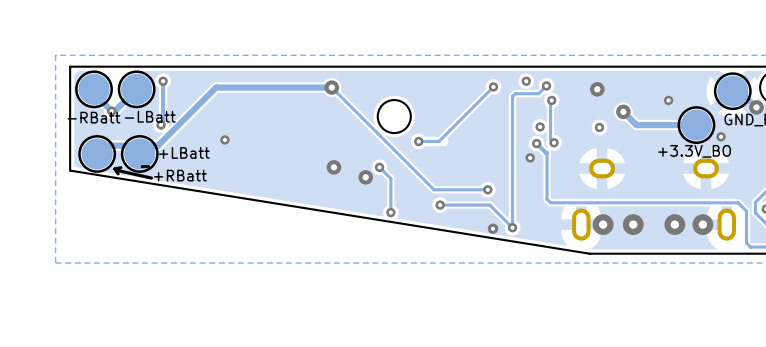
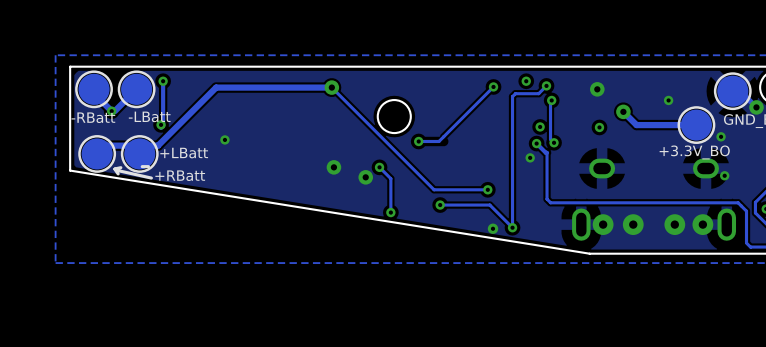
via: none -> (724, 175)

